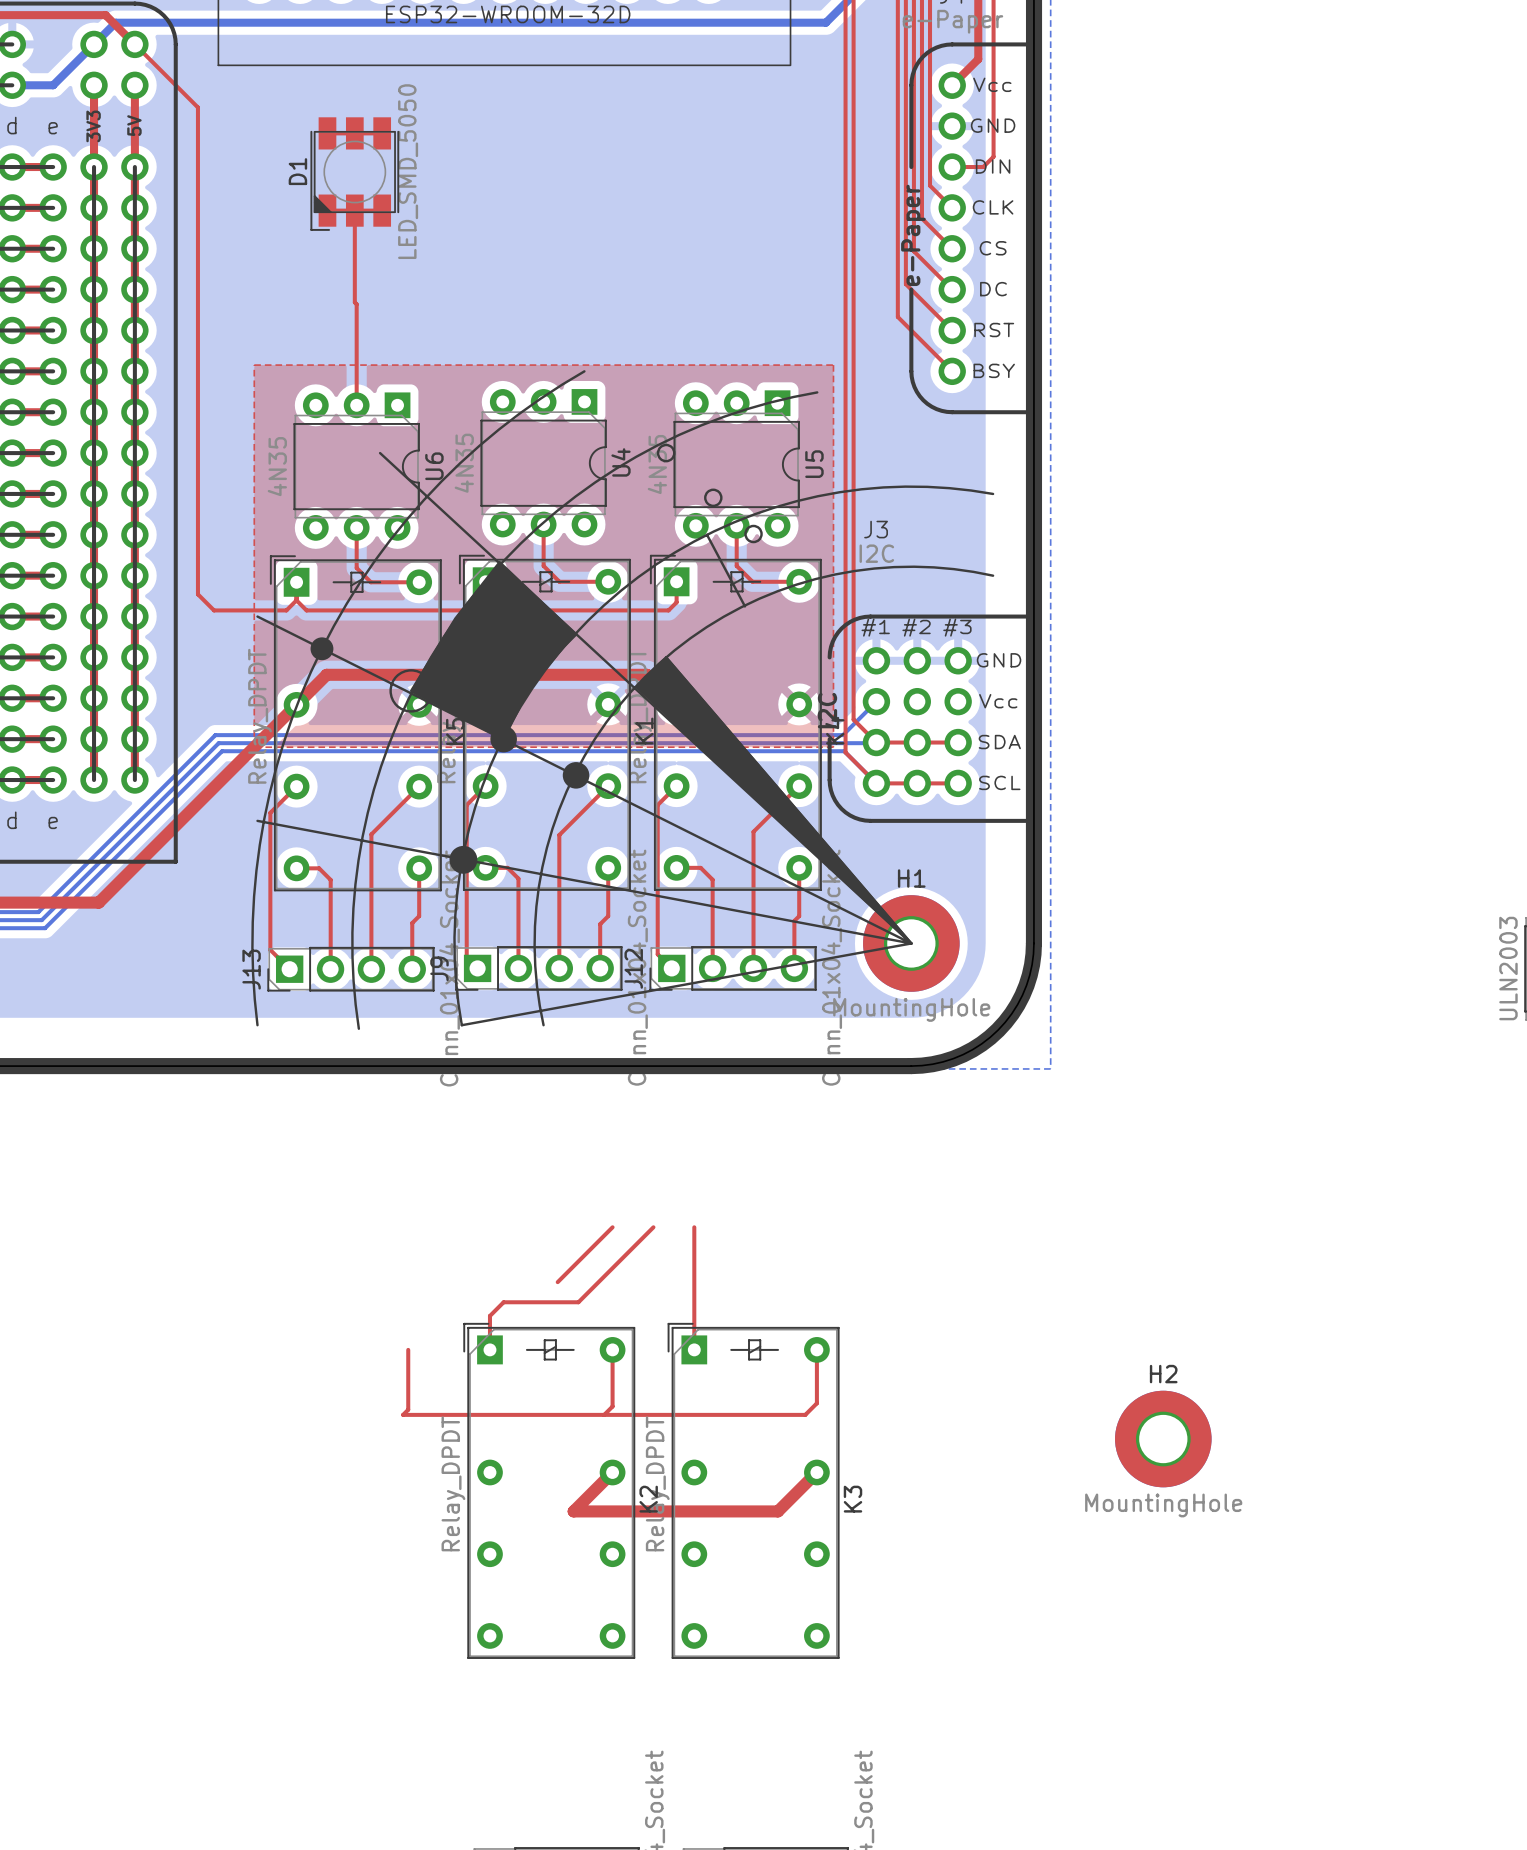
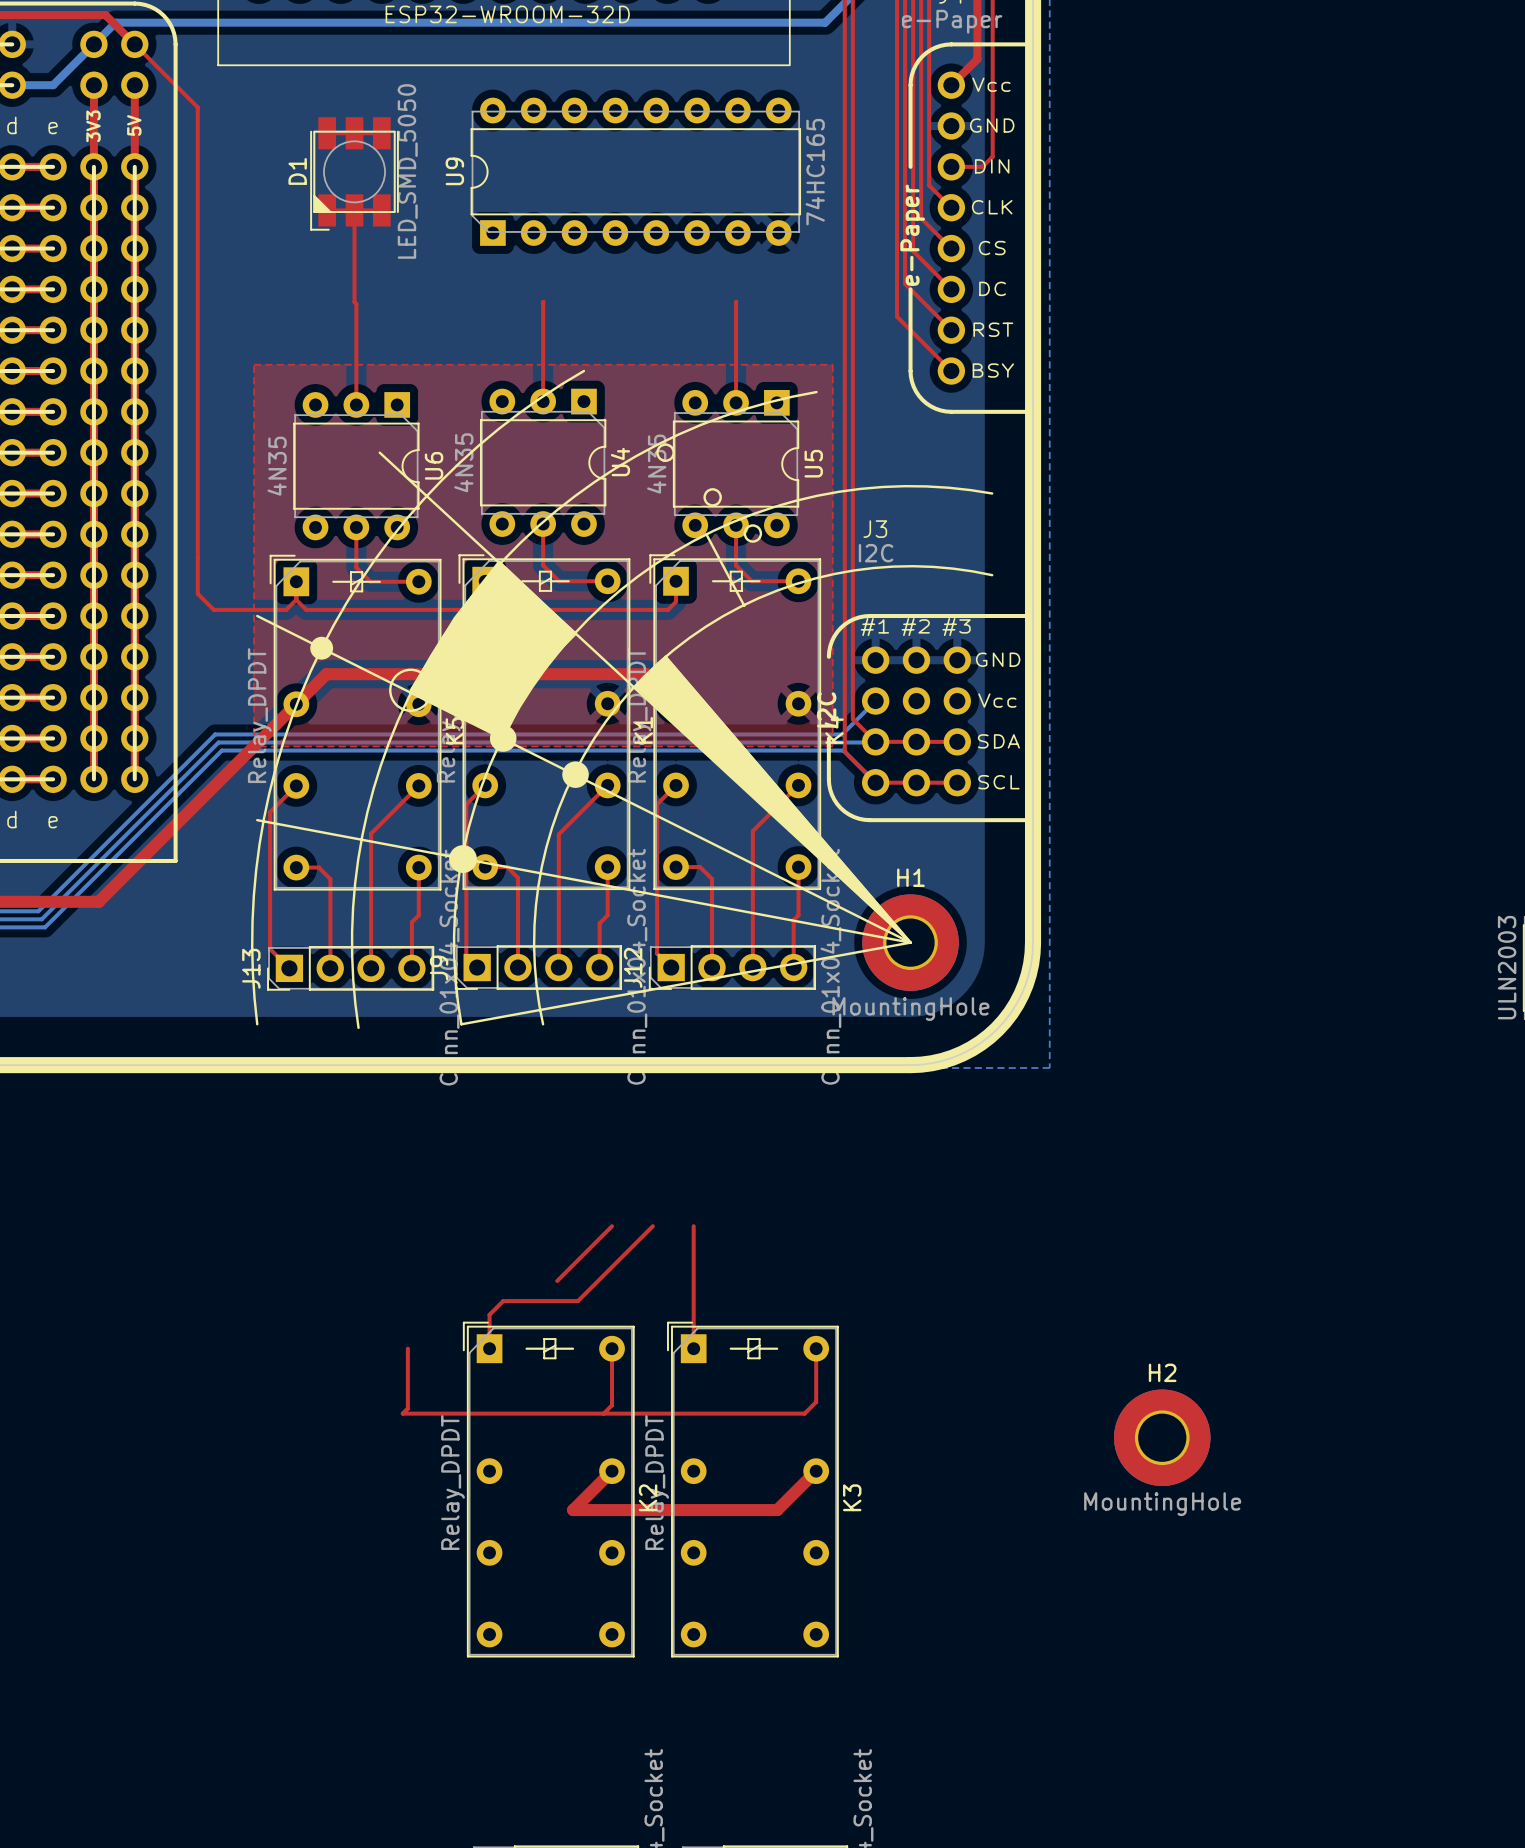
U9: none -> 74HC165 (635, 171)
top track: none -> (543, 301) (543, 401)
top track: none -> (736, 301) (736, 402)

